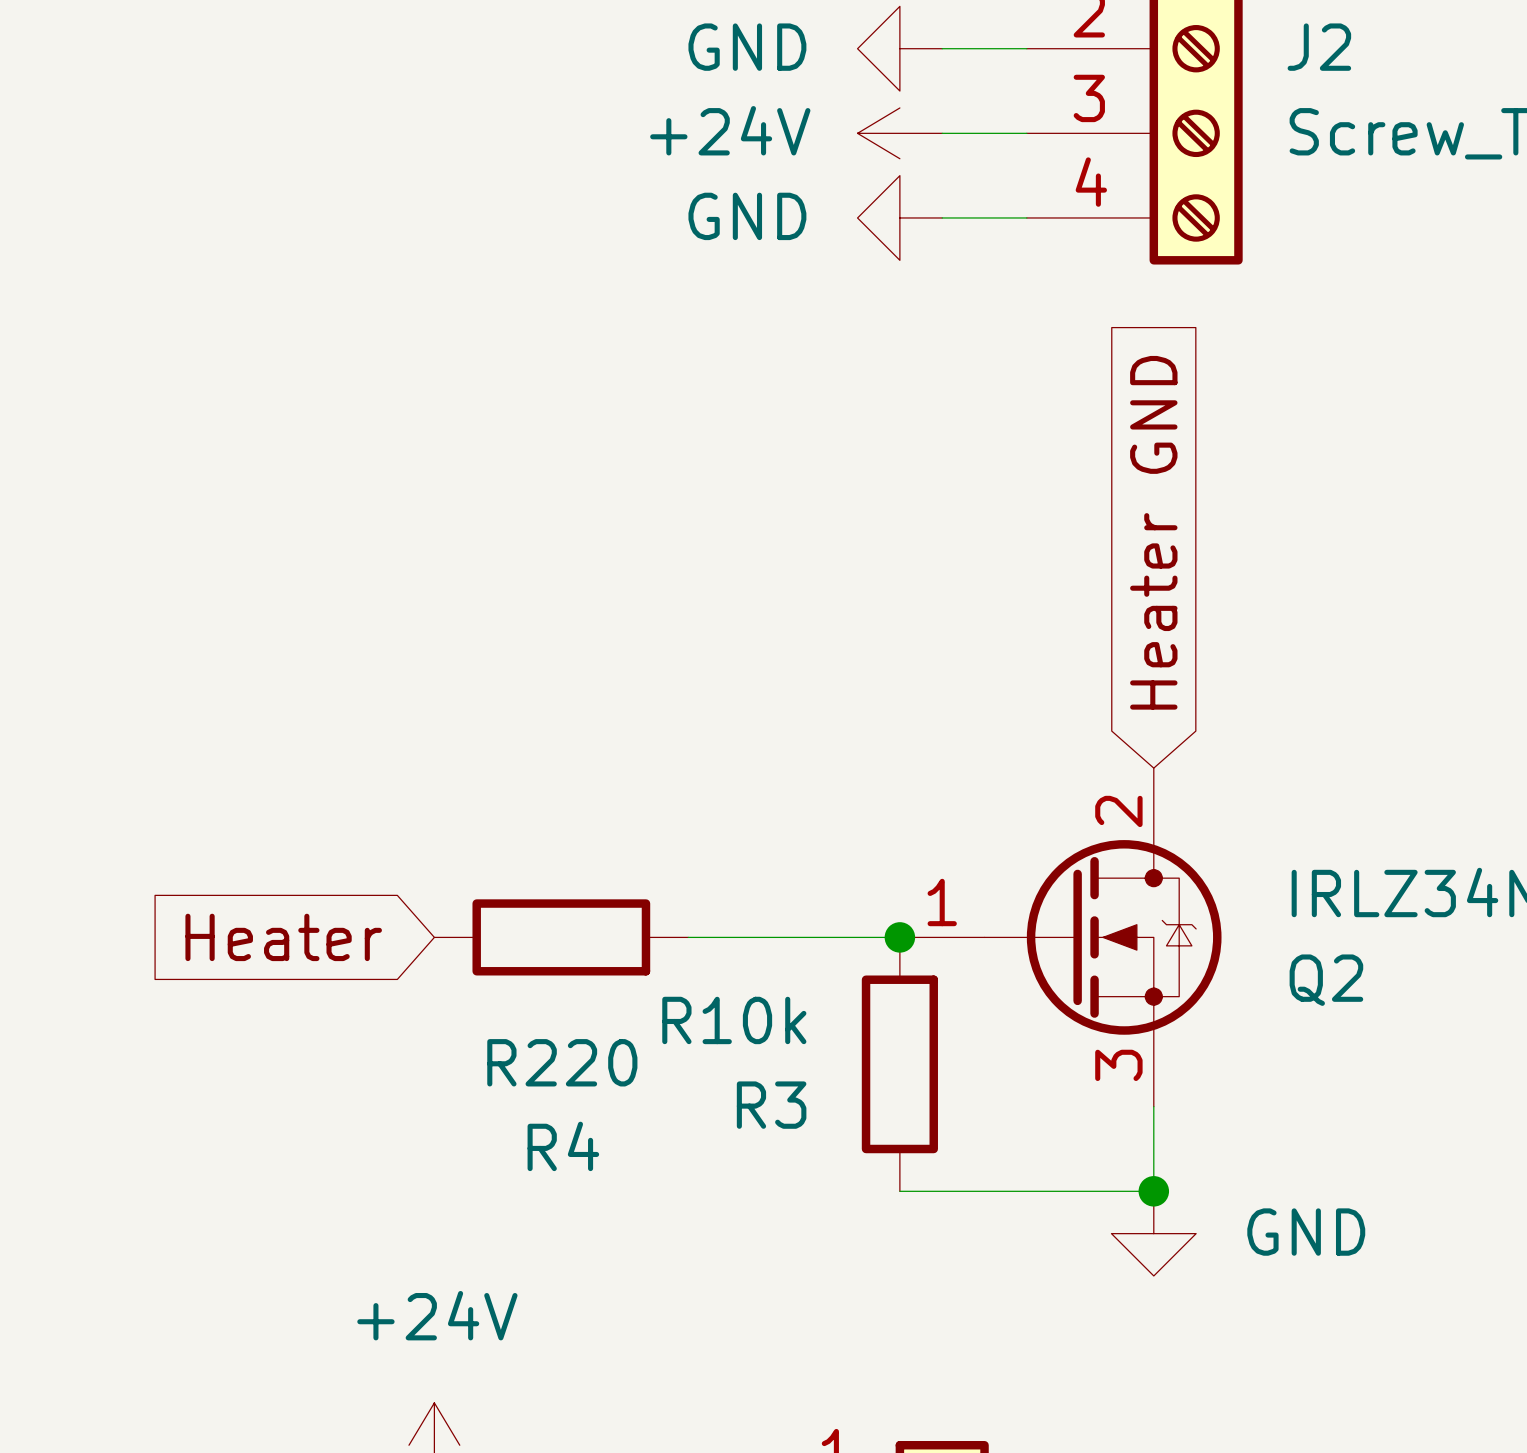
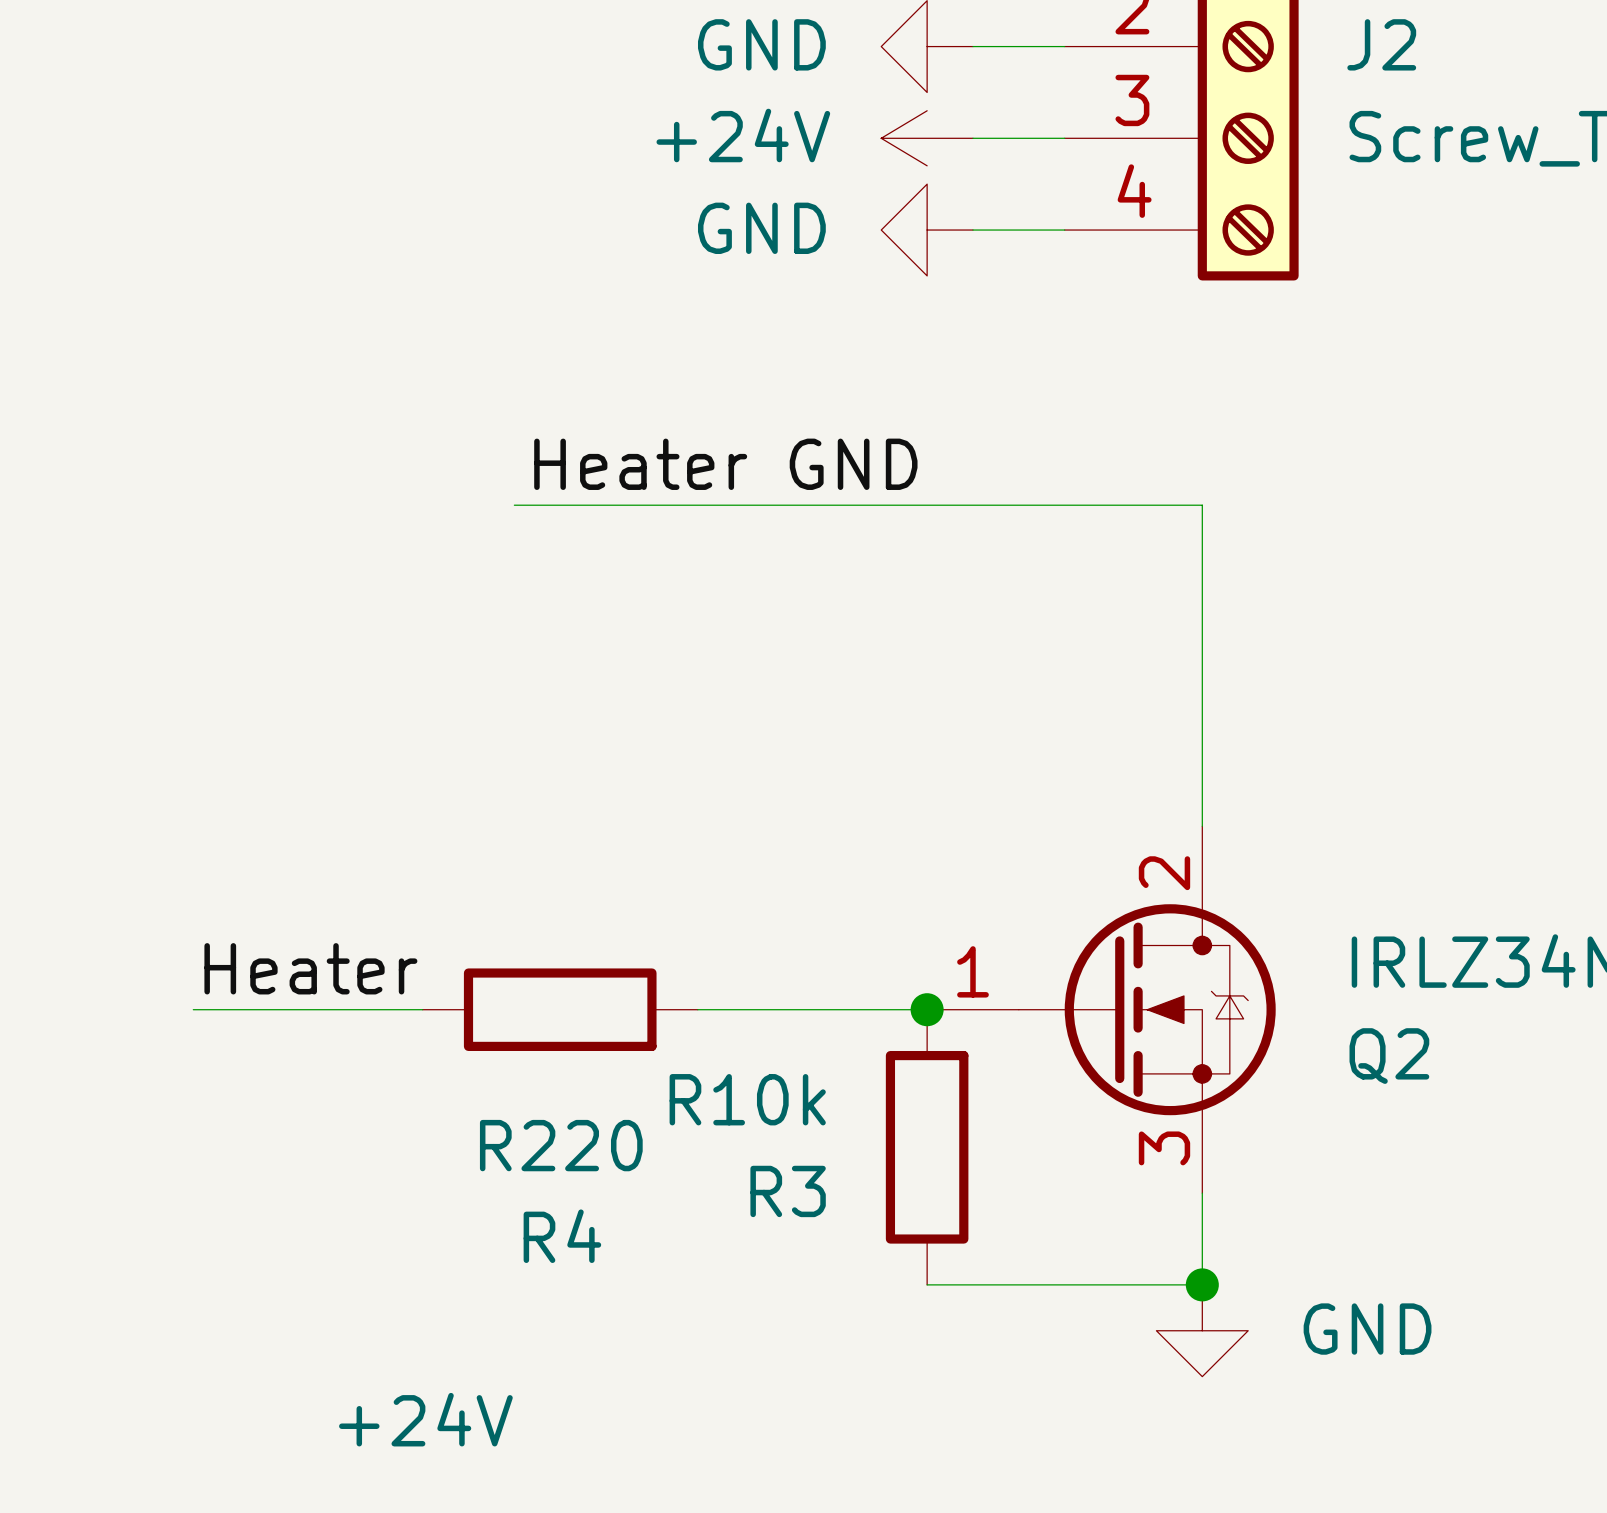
label: none -> Heater GND (725, 464)
wire: none -> (514, 505) (1202, 505) (1202, 826)
global label: Heater GND (1153, 532) -> none
label: none -> Heater (310, 968)
wire: none -> (193, 1009) (422, 1009)
global label: Heater (283, 937) -> none

